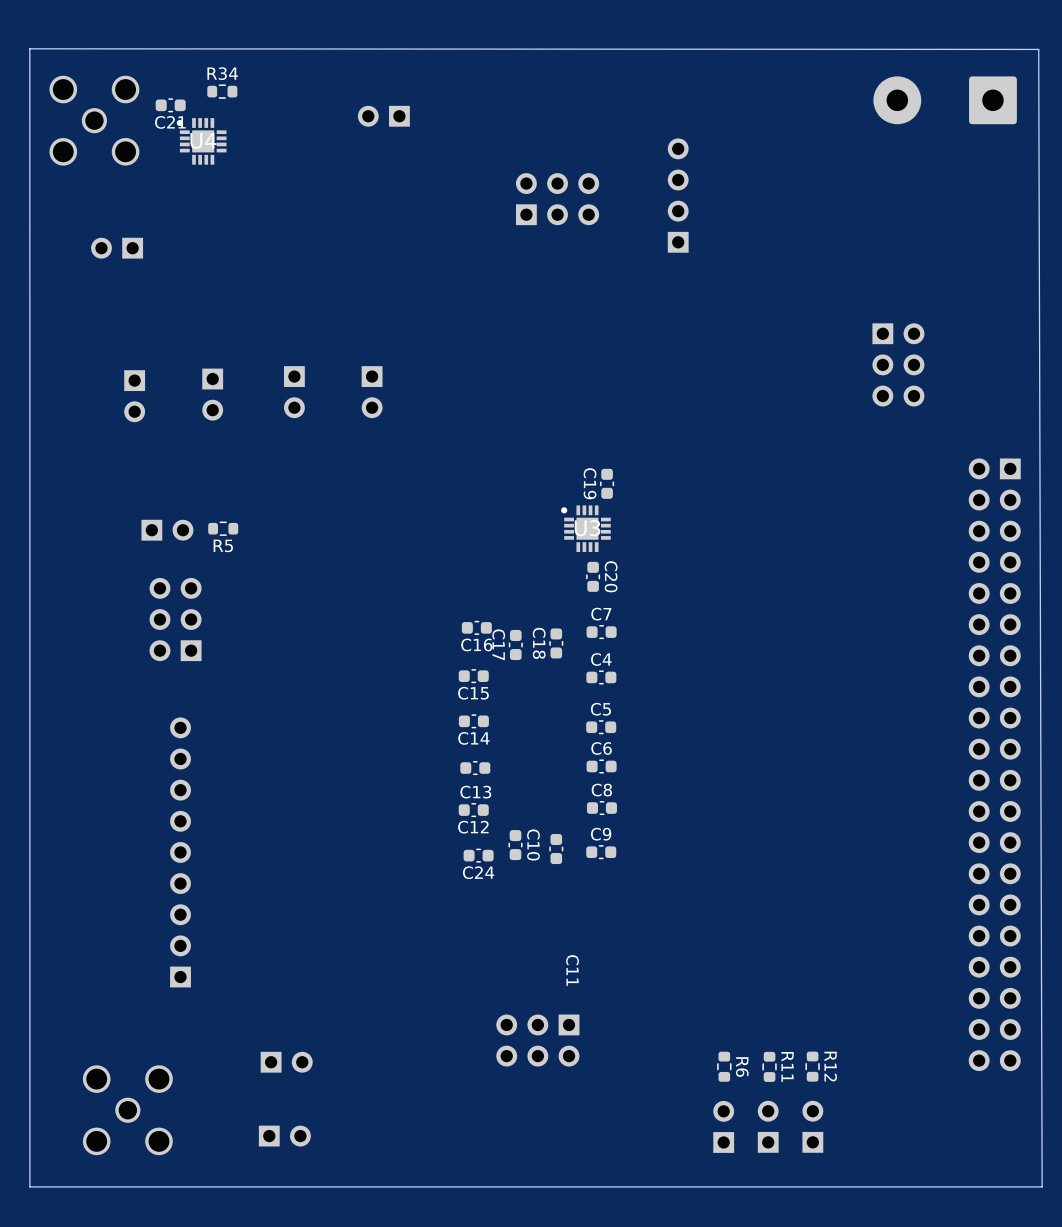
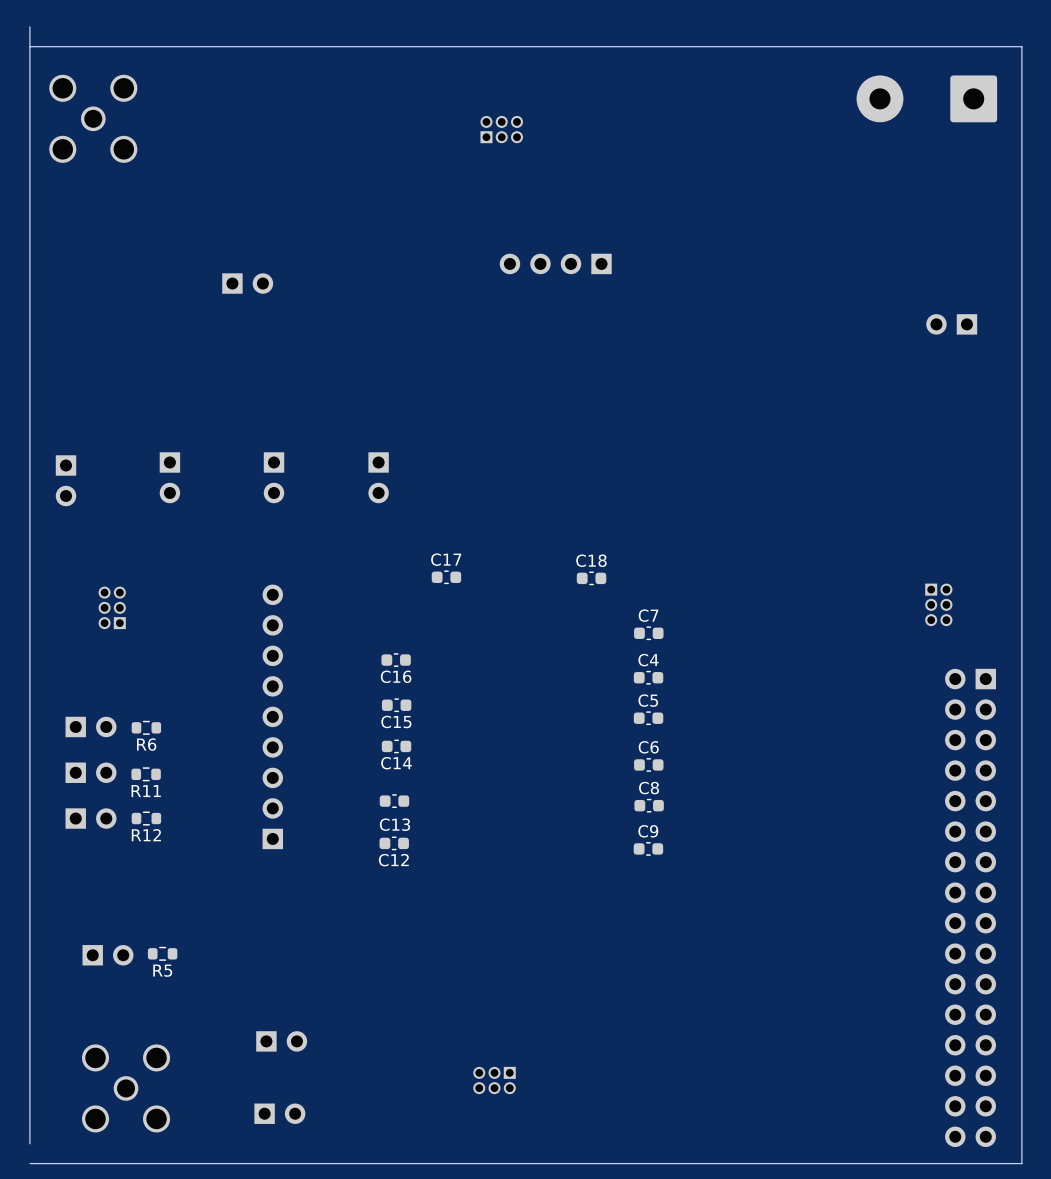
board edge: none -> (29, 26) (29, 1143)
R34: (222, 91) -> none
C21: (170, 105) -> none
part: (383, 116) -> none
part: none -> (501, 129)
part: (201, 141) -> none
part rotation: 0° (678, 195) -> 90° counterclockwise (555, 263)
part position: (678, 195) -> (555, 263)
part: (557, 199) -> none
part: (117, 248) -> none
part: none -> (247, 283)
part: none -> (951, 324)
part: (898, 364) -> none
part: (294, 392) -> none
part: (372, 392) -> none
part: (212, 394) -> none
part: (134, 396) -> none
C19: (607, 483) -> none
part: none -> (274, 477)
part: none -> (378, 477)
part: none -> (65, 480)
R5 position: (223, 528) -> (162, 953)
part: (585, 528) -> none
part rotation: 0° (167, 530) -> 90° clockwise (169, 477)
part position: (167, 530) -> (169, 477)
C20: (593, 576) -> none
part: none -> (938, 604)
part: none -> (112, 607)
part: (175, 619) -> none
C16 position: (476, 627) -> (396, 660)
C7 position: (601, 632) -> (648, 633)
C18 rotation: 0° (556, 643) -> 90° clockwise (591, 578)
C18 position: (556, 643) -> (591, 578)
C17 rotation: 0° (515, 645) -> 90° clockwise (446, 577)
C17 position: (515, 645) -> (446, 577)
C15 position: (473, 676) -> (396, 705)
C4 position: (601, 677) -> (648, 677)
C14 position: (473, 721) -> (396, 746)
C5 position: (601, 727) -> (648, 718)
part: none -> (91, 726)
part: (994, 764) -> none
C6 position: (601, 766) -> (648, 764)
C13 position: (475, 768) -> (394, 801)
part: none -> (91, 772)
C8 position: (601, 808) -> (649, 805)
C12 position: (473, 810) -> (394, 843)
part: none -> (91, 818)
C10: (515, 845) -> none
C11: (556, 849) -> none
part position: (180, 852) -> (272, 716)
C9 position: (601, 852) -> (648, 848)
C24: (478, 855) -> none
part: none -> (970, 907)
part: none -> (107, 955)
part: (537, 1040) -> none
R6 rotation: 0° (724, 1066) -> 90° clockwise (146, 727)
R6 position: (724, 1066) -> (146, 727)
R11 rotation: 0° (769, 1066) -> 90° clockwise (146, 774)
R11 position: (769, 1066) -> (146, 774)
R12 rotation: 0° (812, 1066) -> 90° clockwise (146, 818)
R12 position: (812, 1066) -> (146, 818)
part: none -> (494, 1080)
part: (723, 1126) -> none
part: (768, 1126) -> none
part: (812, 1126) -> none
board edge: (1042, 1186) (1038, 49) (29, 48) (29, 1186) -> (1021, 1163) (1021, 46) (30, 46)

